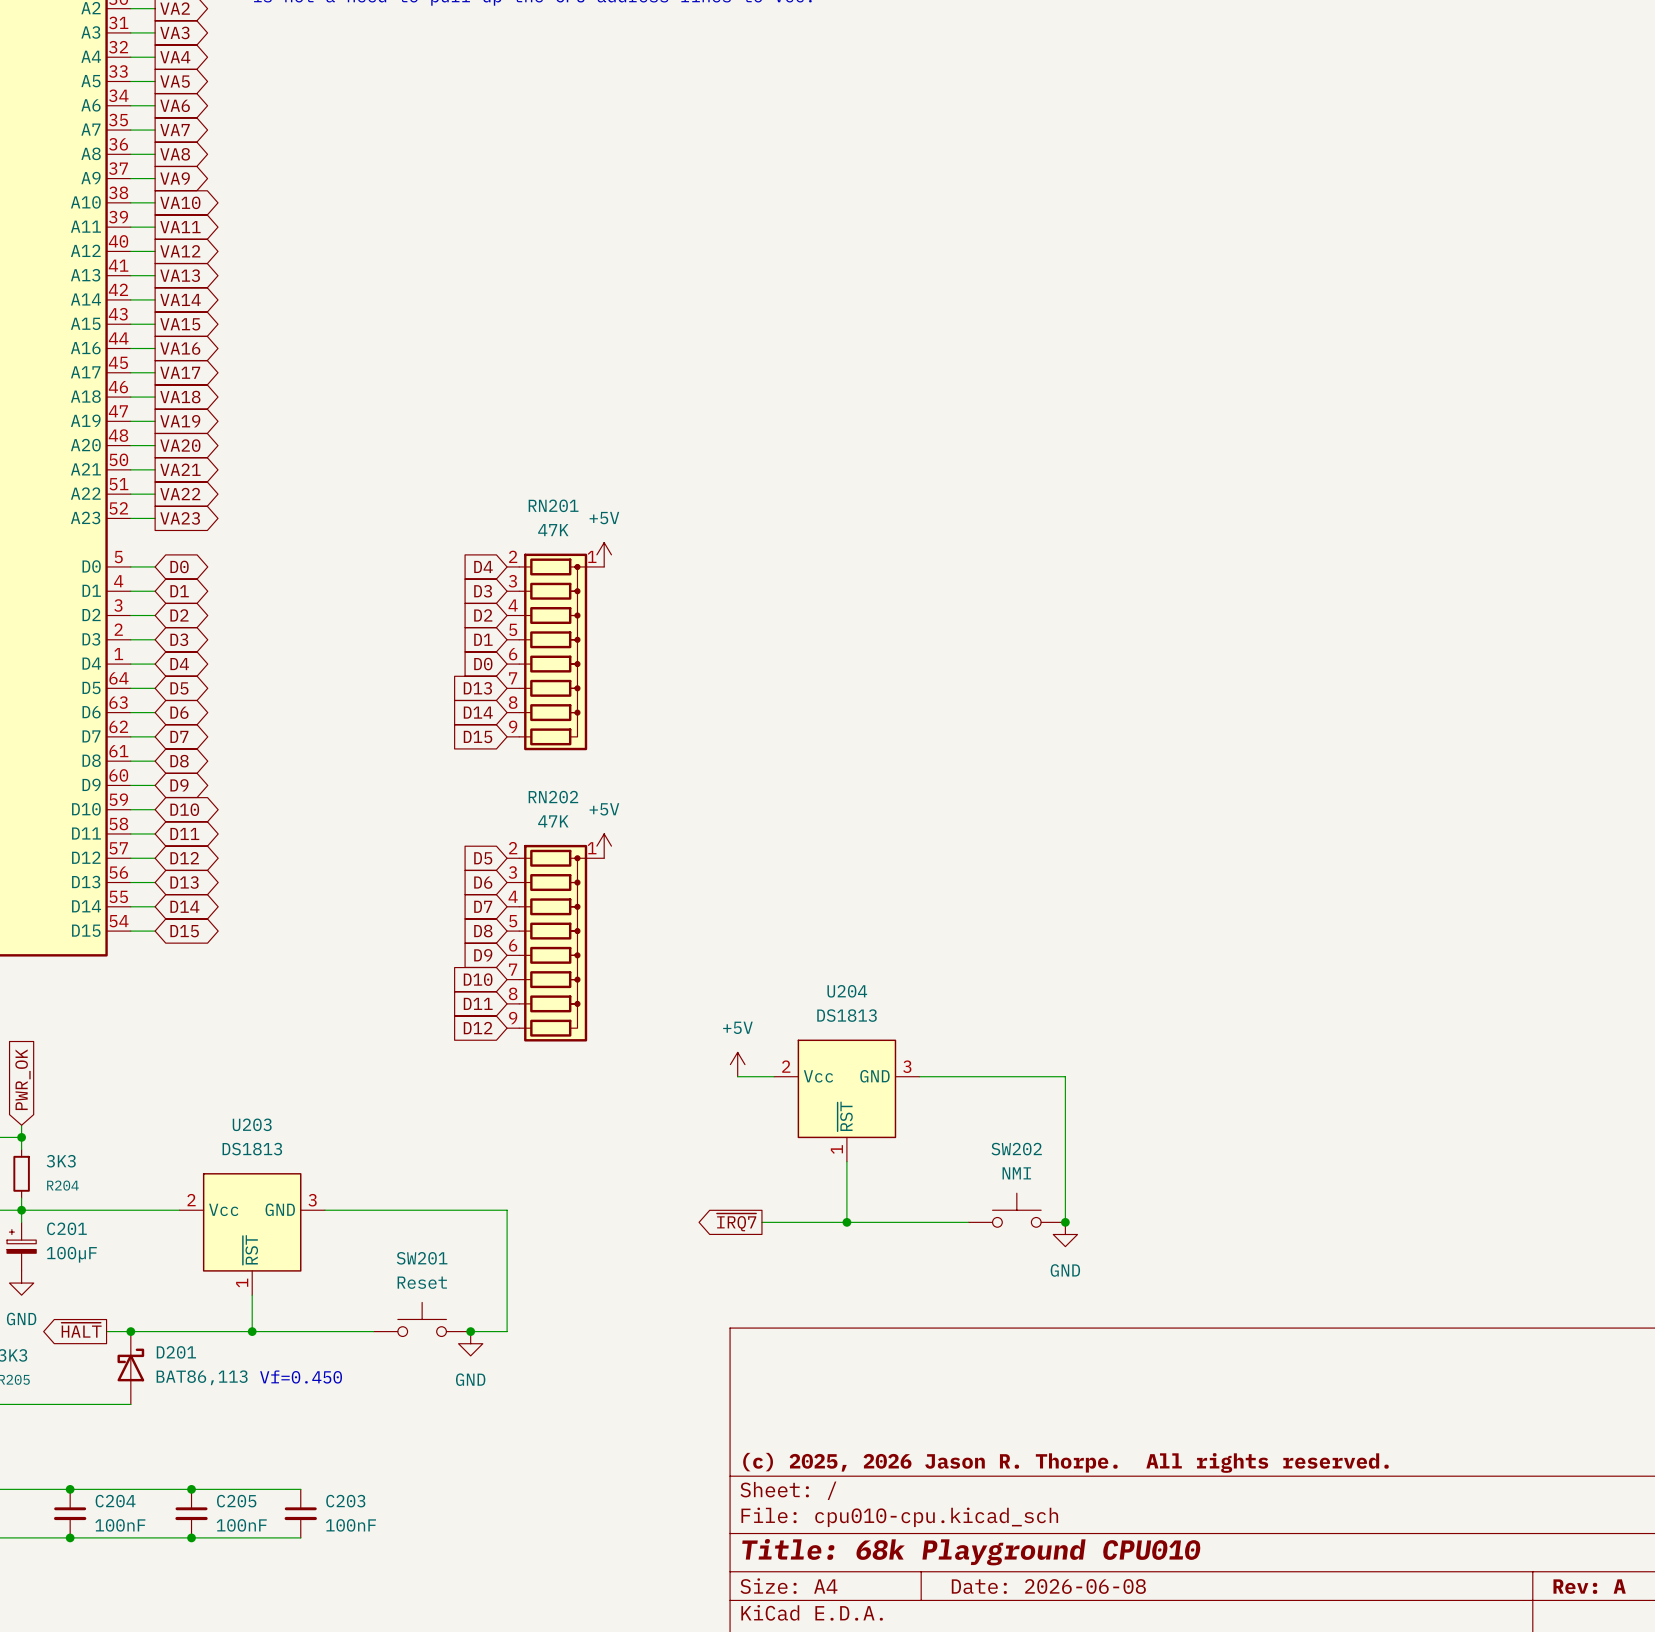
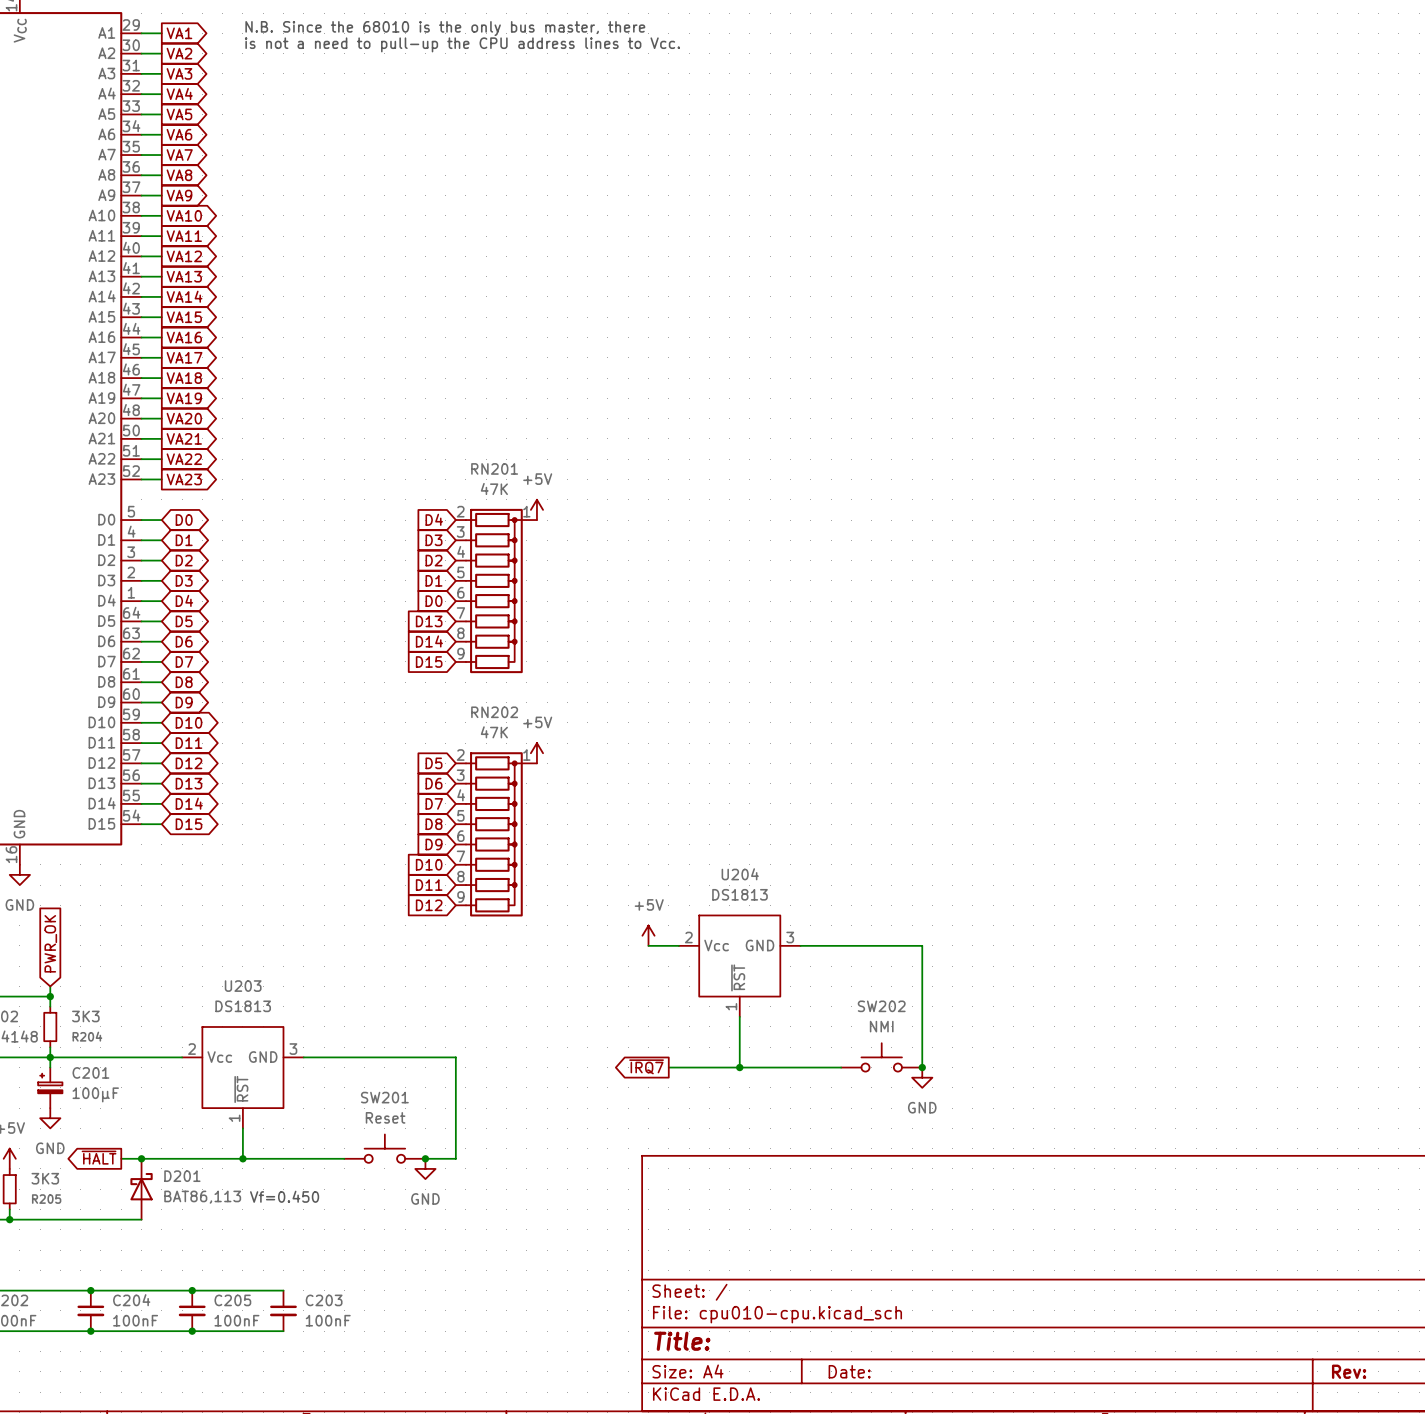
title block: (c) 2025, 2026 Jason R. Thorpe. All rights reserved. (1065, 1462) -> none
title block: Title: 68k Playground CPU010 (971, 1552) -> Title: (682, 1341)
title block: Date: 2026-06-08 (1048, 1586) -> Date: (849, 1371)
title block: Rev: A (1589, 1586) -> Rev: (1349, 1371)

